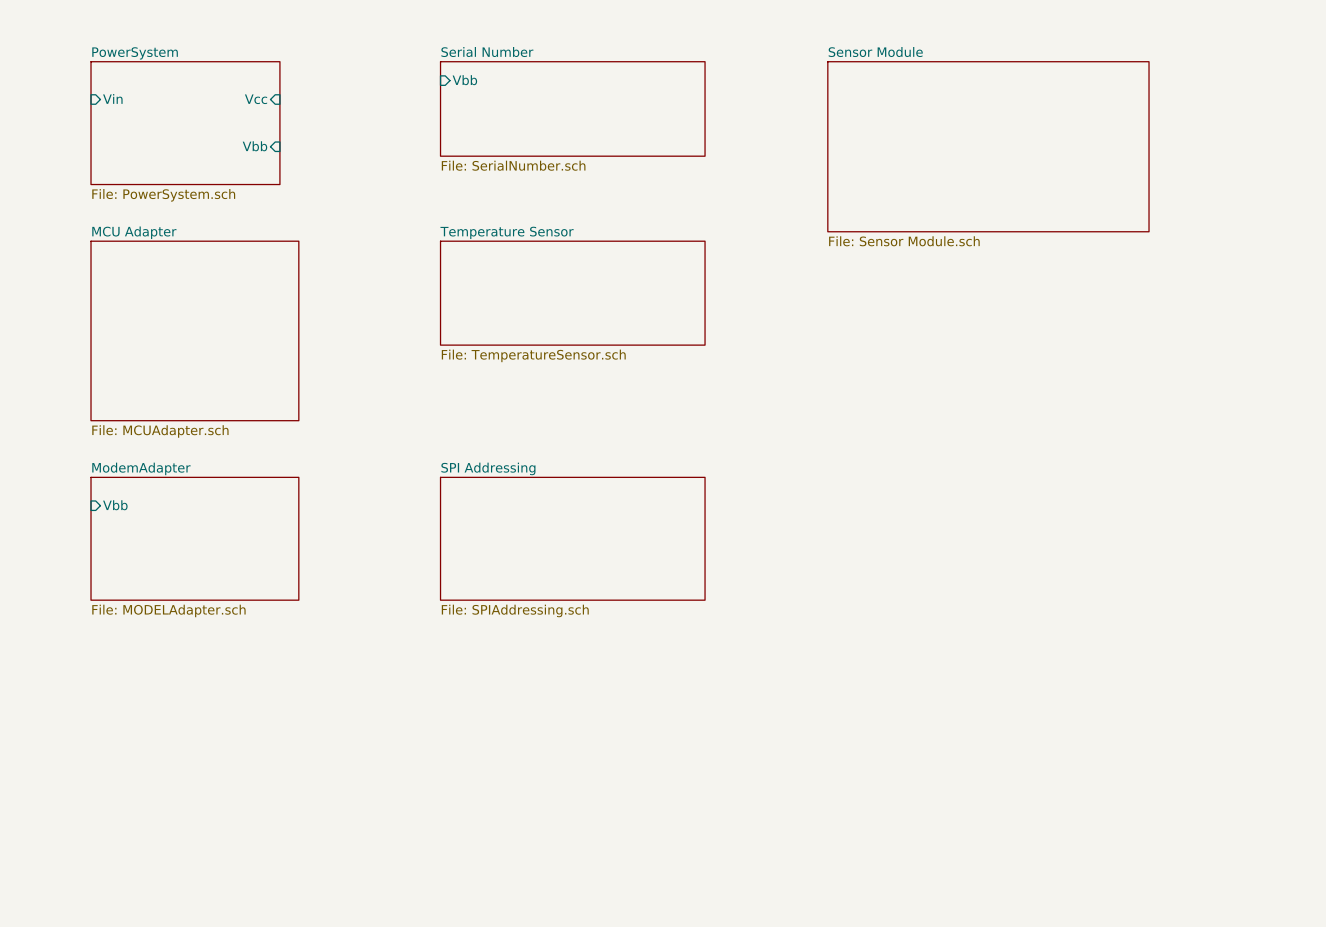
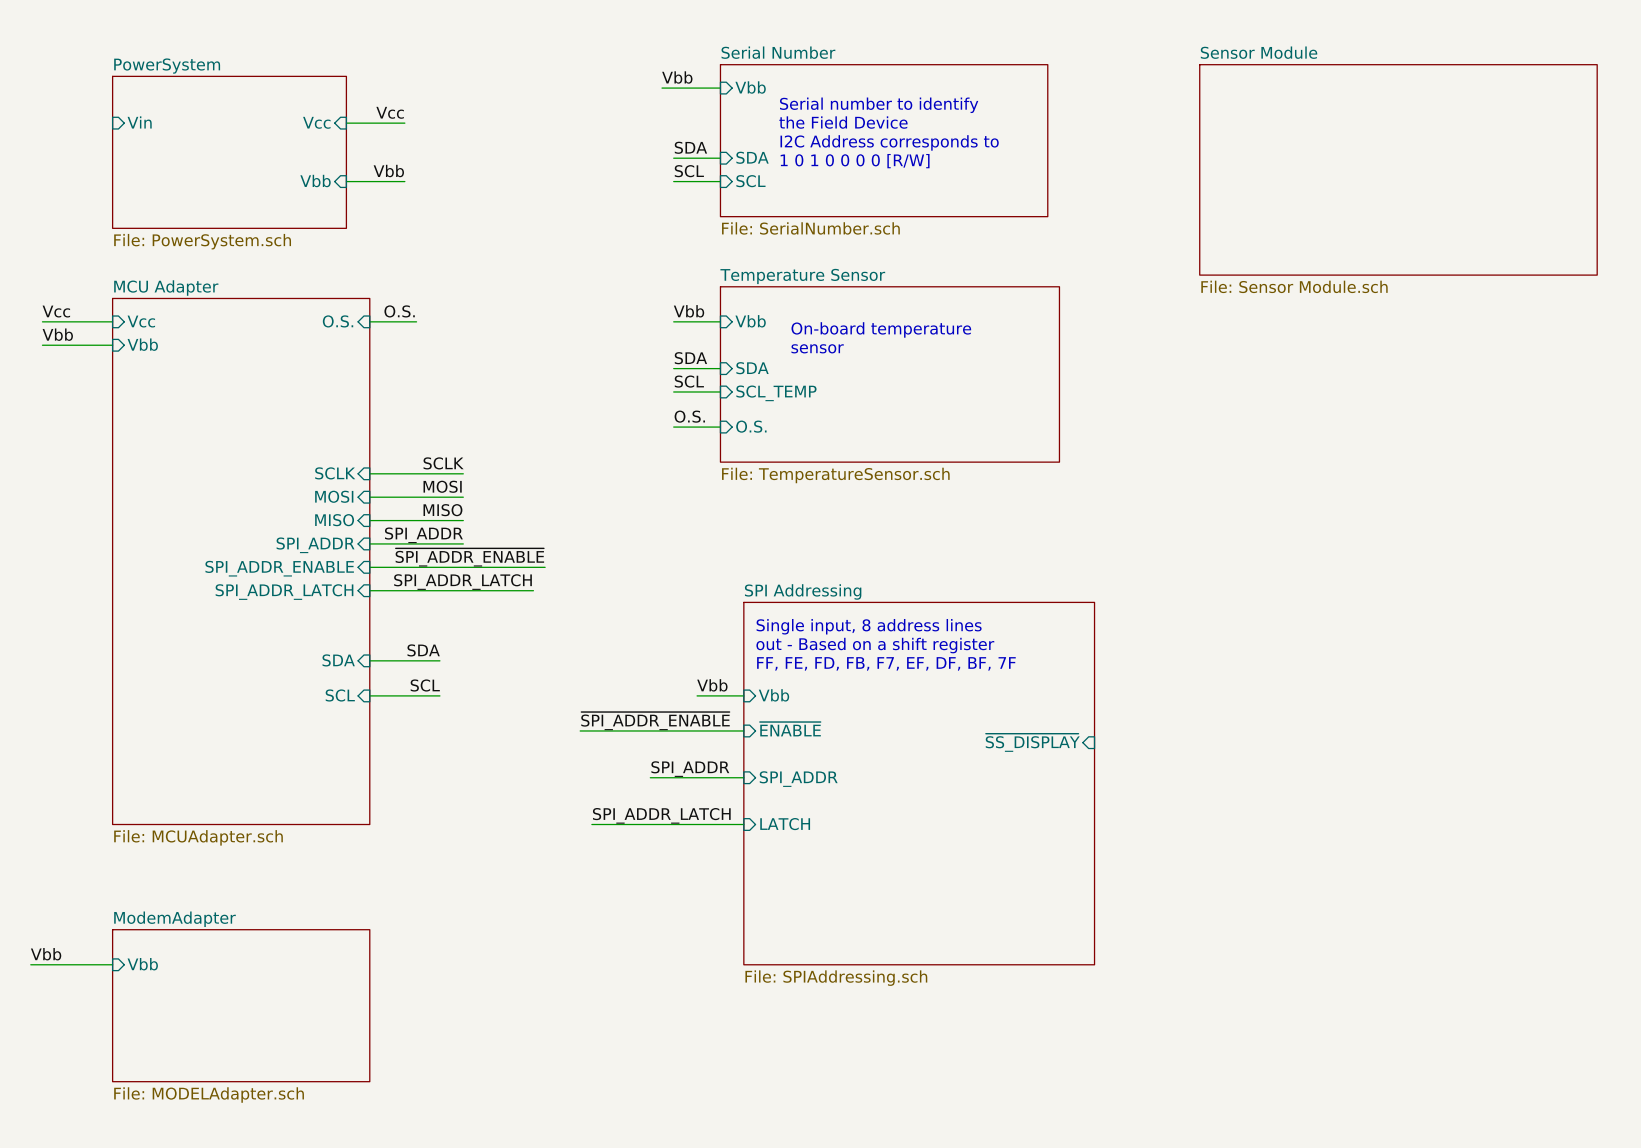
label: none -> Vbb (677, 77)
sheet pin: none -> Vbb (750, 87)
wire: none -> (662, 88) (720, 88)
sheet pin: Vbb (464, 80) -> none
text: none -> Serial number to identify (879, 105)
label: none -> Vcc (390, 112)
wire: none -> (346, 123) (404, 123)
text: none -> the Field Device (843, 122)
sheet Serial Number: File: SerialNumber.sch (572, 108) -> none
sheet Serial Number: none -> File: SerialNumber.sch (884, 140)
text: none -> I2C Address corresponds to (889, 142)
label: none -> SDA (690, 147)
wire: none -> (673, 158) (720, 158)
sheet pin: none -> SDA (752, 157)
text: none -> 1 0 1 0 0 0 0 [R/W] (855, 161)
label: none -> Vbb (388, 171)
label: none -> SCL (689, 171)
wire: none -> (346, 181) (404, 181)
wire: none -> (673, 181) (720, 181)
sheet pin: none -> SCL (750, 181)
sheet Sensor Module position: (988, 146) -> (1398, 169)
label: none -> Vcc (56, 311)
label: none -> O.S. (399, 311)
label: none -> Vbb (689, 311)
sheet pin: none -> Vcc (141, 321)
sheet pin: none -> O.S. (338, 321)
sheet pin: none -> Vbb (750, 321)
wire: none -> (42, 321) (112, 321)
wire: none -> (369, 321) (416, 321)
wire: none -> (673, 321) (720, 321)
text: none -> On-board temperature (881, 329)
label: none -> Vbb (57, 334)
wire: none -> (42, 345) (112, 345)
sheet pin: none -> Vbb (142, 344)
text: none -> sensor (817, 348)
label: none -> SDA (690, 358)
sheet Temperature Sensor: File: TemperatureSensor.sch (572, 293) -> none
wire: none -> (673, 368) (720, 368)
sheet pin: none -> SDA (752, 368)
sheet Temperature Sensor: none -> File: TemperatureSensor.sch (889, 374)
label: none -> SCL (689, 381)
wire: none -> (673, 391) (720, 391)
sheet pin: none -> SCL_TEMP (776, 393)
sheet MCU Adapter: File: MCUAdapter.sch (194, 330) -> none
label: none -> O.S. (689, 416)
sheet pin: none -> O.S. (751, 426)
label: none -> SCLK (443, 463)
sheet pin: none -> SCLK (335, 473)
wire: none -> (369, 473) (463, 473)
label: none -> MOSI (442, 486)
sheet pin: none -> MOSI (334, 496)
wire: none -> (369, 497) (463, 497)
label: none -> MISO (442, 510)
sheet pin: none -> MISO (334, 520)
wire: none -> (369, 520) (463, 520)
label: none -> SPI_ADDR (423, 535)
wire: none -> (369, 543) (463, 543)
sheet pin: none -> SPI_ADDR (315, 545)
label: none -> ~{SPI_ADDR_ENABLE} (469, 557)
sheet MCU Adapter: none -> File: MCUAdapter.sch (241, 561)
wire: none -> (369, 567) (545, 567)
sheet pin: none -> SPI_ADDR_ENABLE (279, 568)
label: none -> SPI_ADDR_LATCH (463, 582)
wire: none -> (369, 590) (533, 590)
sheet pin: none -> SPI_ADDR_LATCH (284, 592)
sheet pin: Vbb (115, 505) -> none
text: none -> Single input, 8 address lines (869, 626)
text: none -> out - Based on a shift register (875, 645)
label: none -> SDA (423, 650)
sheet pin: none -> SDA (338, 660)
wire: none -> (369, 660) (439, 660)
text: none -> FF, FE, FD, FB, F7, EF, DF, BF, 7F (886, 663)
sheet ModemAdapter: File: MODELAdapter.sch (194, 538) -> none
sheet SPI Addressing: File: SPIAddressing.sch (572, 538) -> none
label: none -> SCL (425, 685)
label: none -> Vbb (712, 685)
sheet pin: none -> Vbb (773, 695)
sheet pin: none -> SCL (340, 695)
wire: none -> (369, 695) (439, 695)
wire: none -> (697, 695) (743, 695)
label: none -> ~{SPI_ADDR_ENABLE} (655, 721)
sheet pin: none -> ~{ENABLE} (790, 729)
wire: none -> (580, 730) (743, 730)
sheet pin: none -> ~{SS_DISPLAY} (1032, 742)
label: none -> SPI_ADDR (690, 769)
wire: none -> (650, 777) (743, 777)
sheet pin: none -> SPI_ADDR (798, 779)
sheet SPI Addressing: none -> File: SPIAddressing.sch (919, 783)
label: none -> SPI_ADDR_LATCH (661, 815)
sheet pin: none -> LATCH (785, 824)
wire: none -> (591, 824) (743, 824)
label: none -> Vbb (46, 954)
wire: none -> (30, 964) (112, 964)
sheet pin: none -> Vbb (142, 964)
sheet ModemAdapter: none -> File: MODELAdapter.sch (241, 1005)

